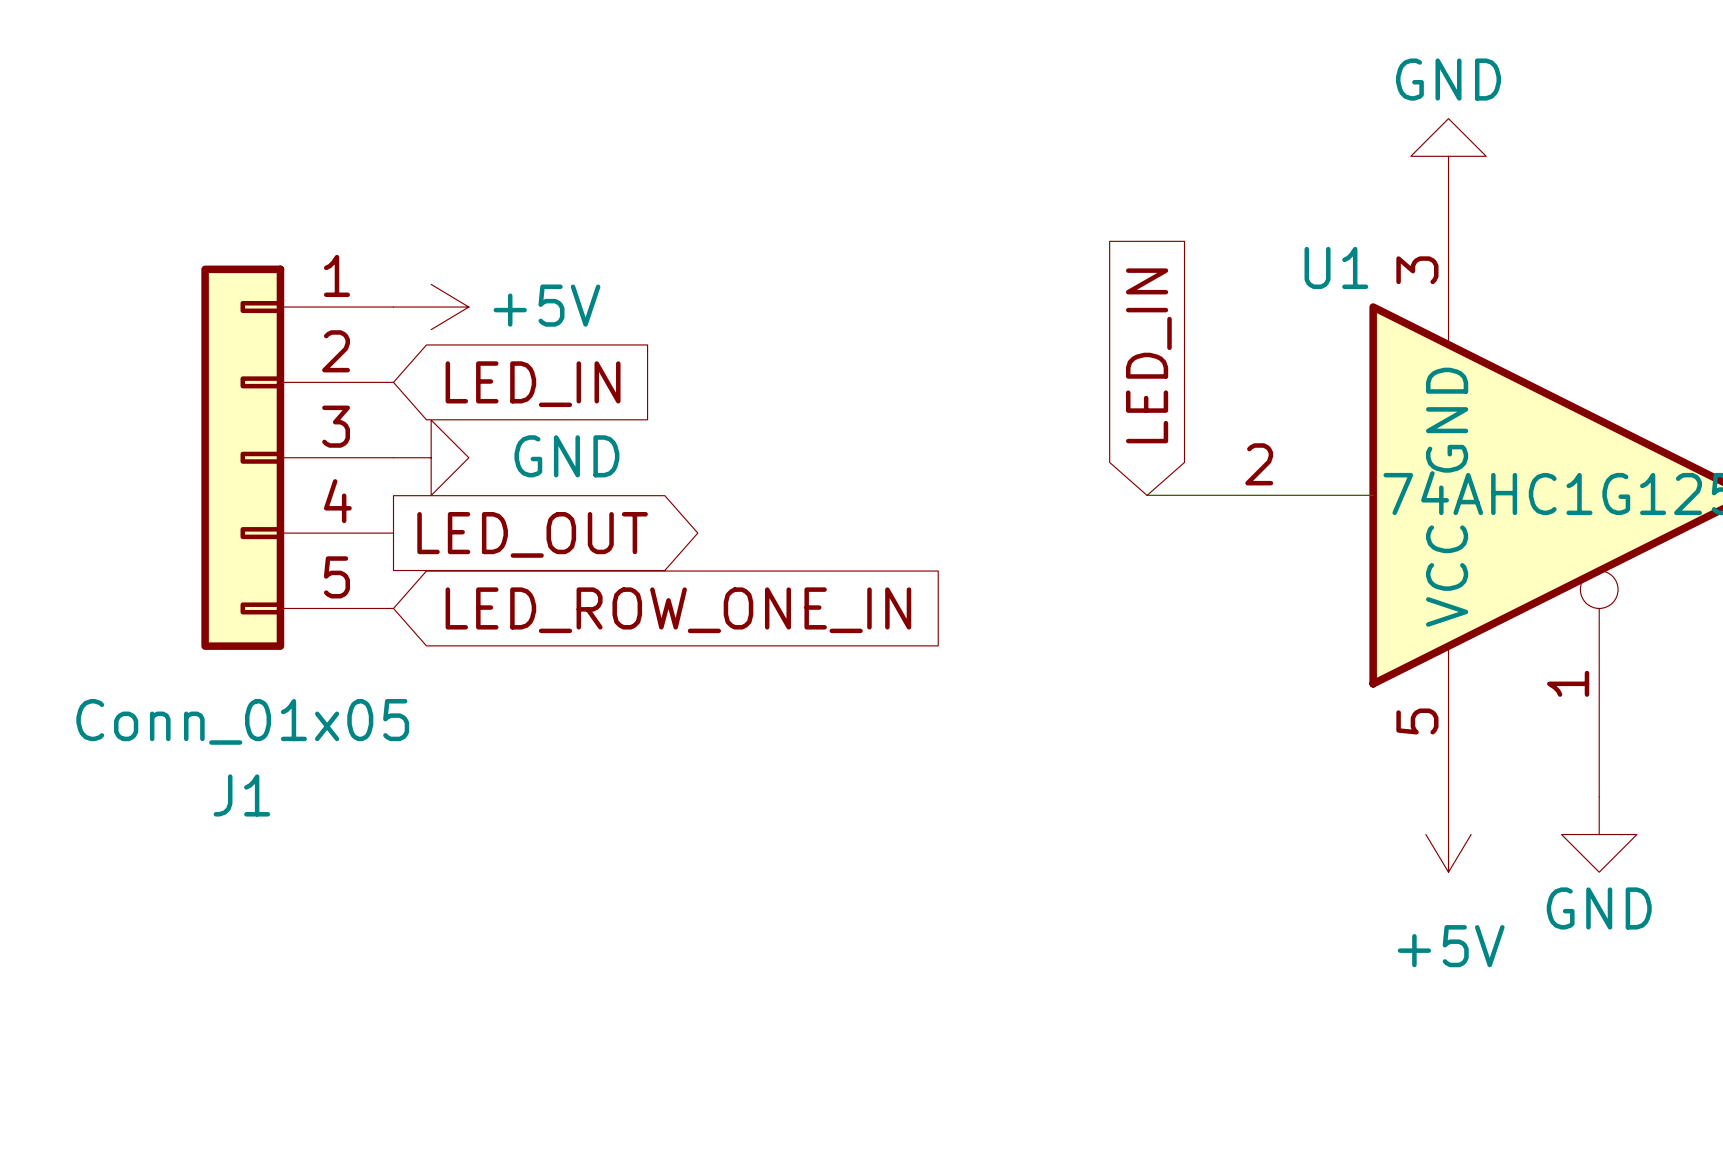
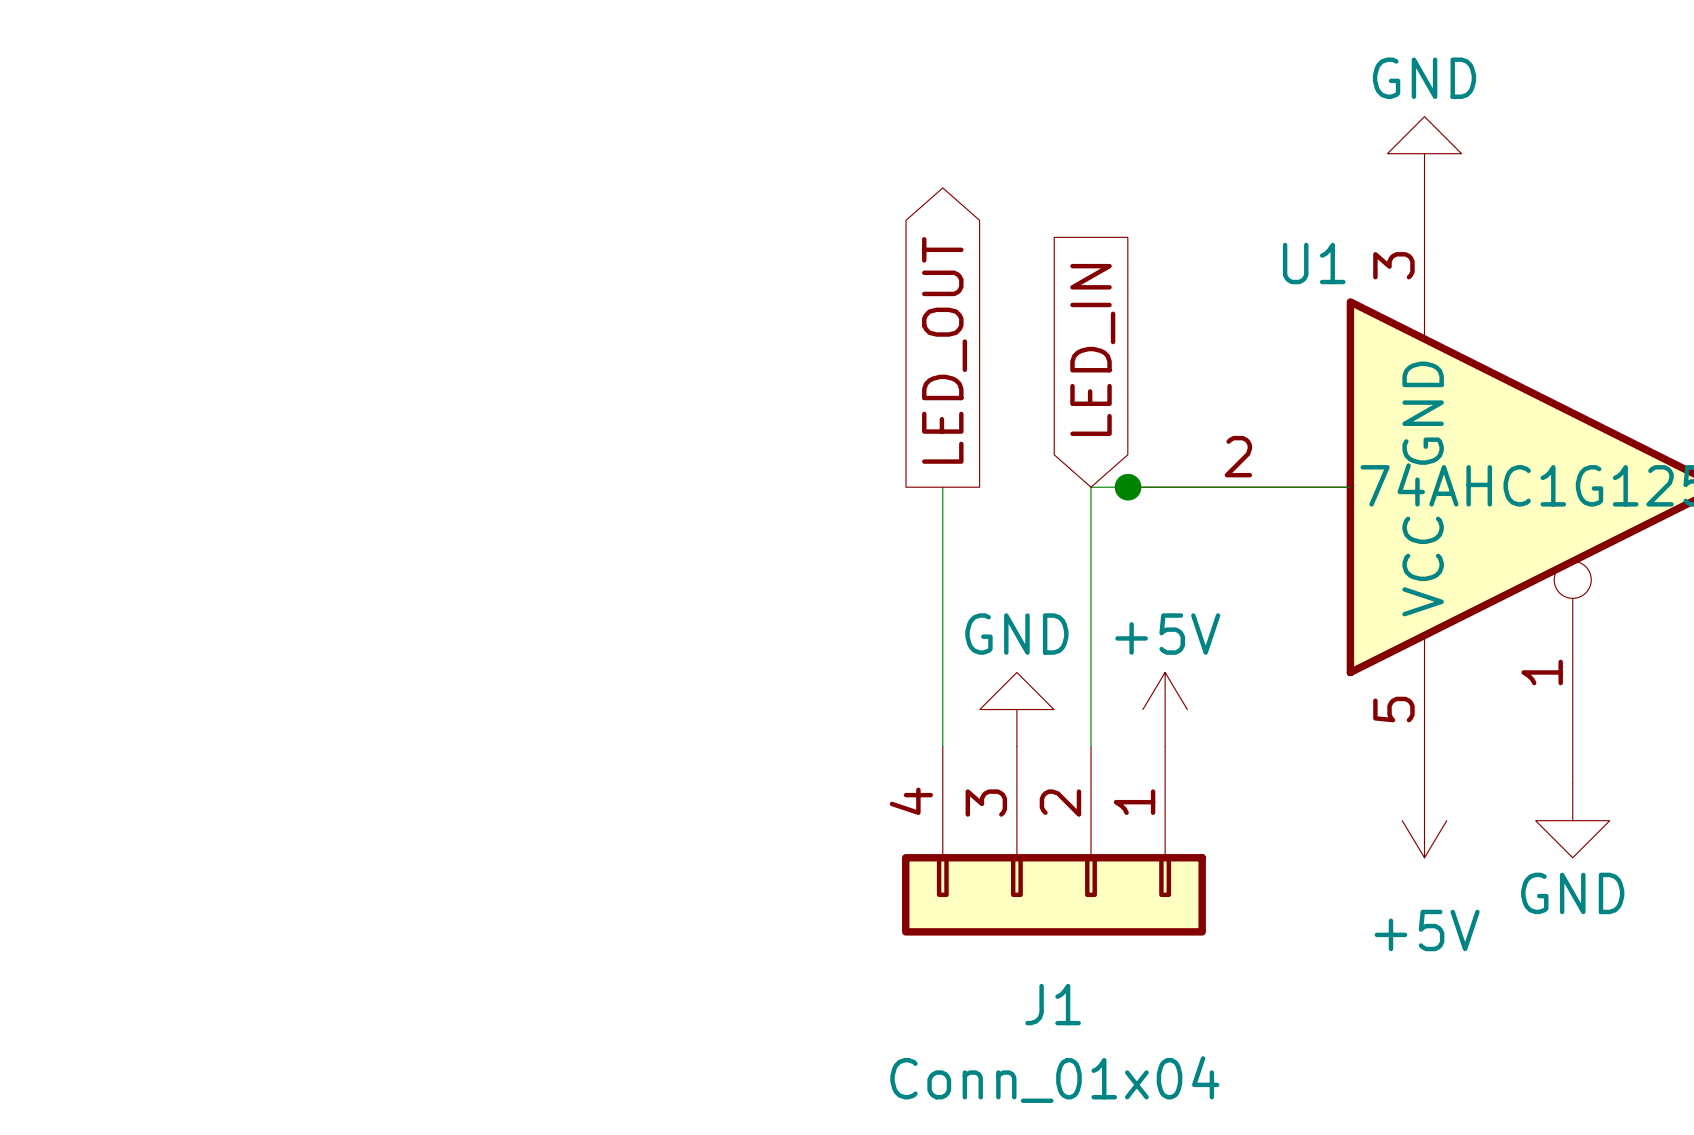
J1 symbol: [201, 265, 394, 650] -> [902, 746, 1206, 936]
power symbol: +5V (431, 307) -> none
global label position: LED_IN (1148, 355) -> LED_IN (1092, 349)
global label: LED_IN (533, 384) -> none
power symbol text position: GND (566, 456) -> GND (1016, 634)
power symbol rotation: 0° (431, 457) -> 90° counterclockwise (1016, 709)
power symbol position: GND (431, 457) -> GND (1016, 709)
wire: none -> (942, 487) (942, 746)
wire: none -> (1128, 487) (1091, 487) (1091, 746)
junction: none -> (1128, 487)
global label rotation: 0° (532, 534) -> 90° counterclockwise (944, 350)
global label position: LED_OUT (532, 534) -> LED_OUT (944, 350)
global label: LED_ROW_ONE_IN (678, 610) -> none
J1 value: Conn_01x05 (242, 721) -> Conn_01x04 (1054, 1079)
power symbol: none -> +5V (1165, 709)
J1 name position: J1 (241, 795) -> J1 (1053, 1004)

